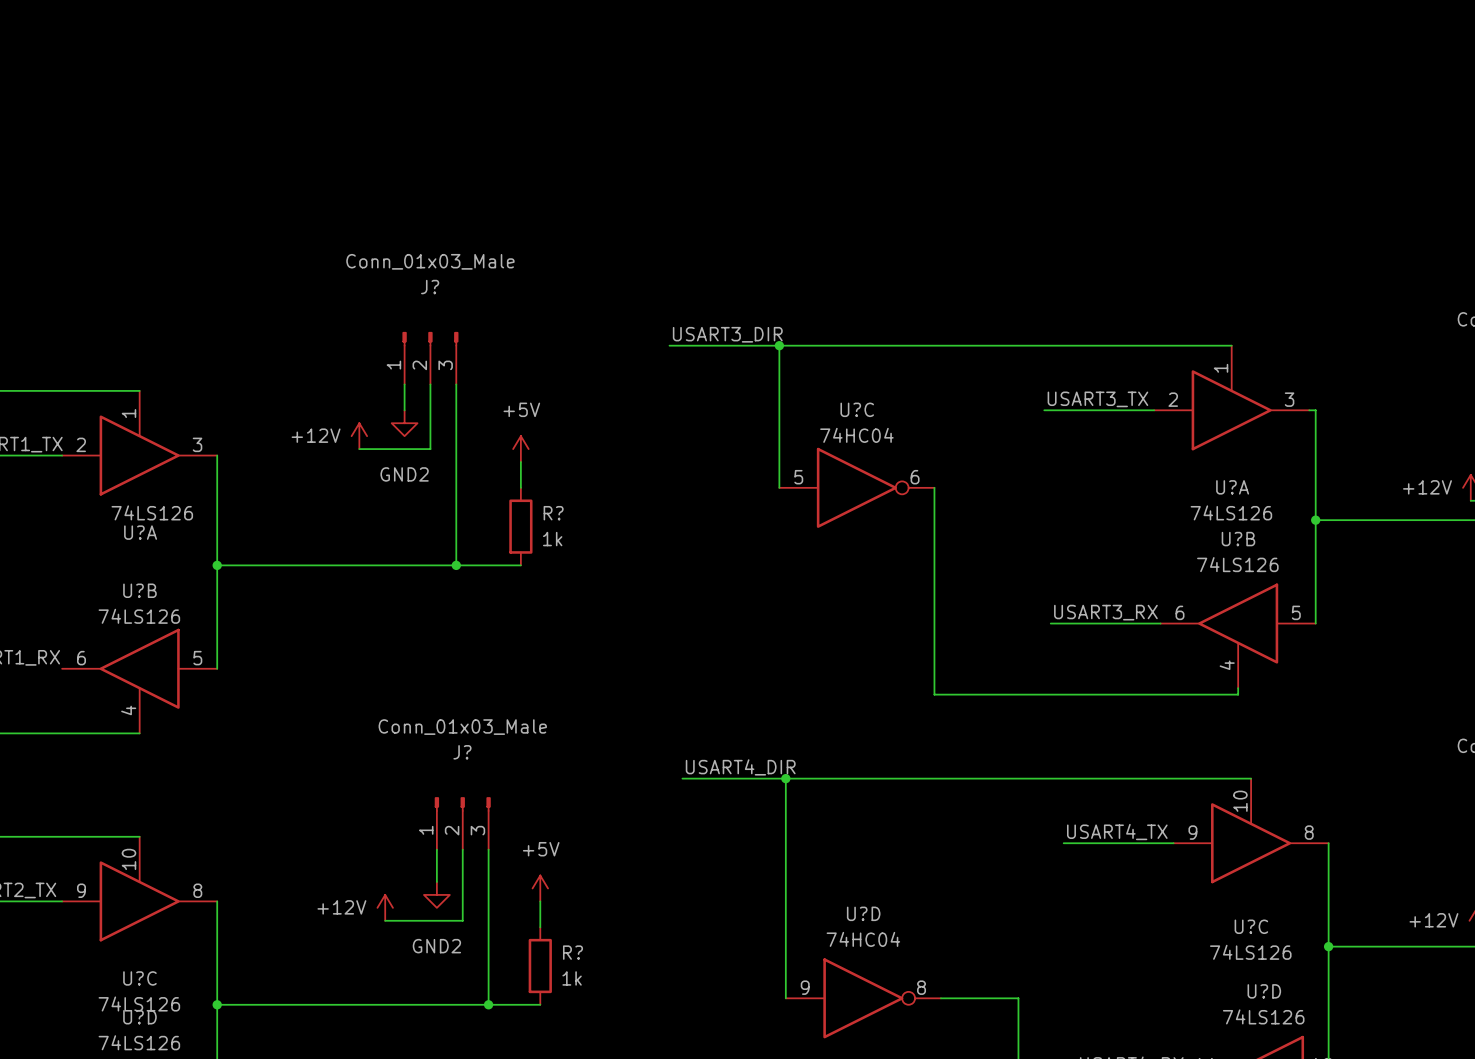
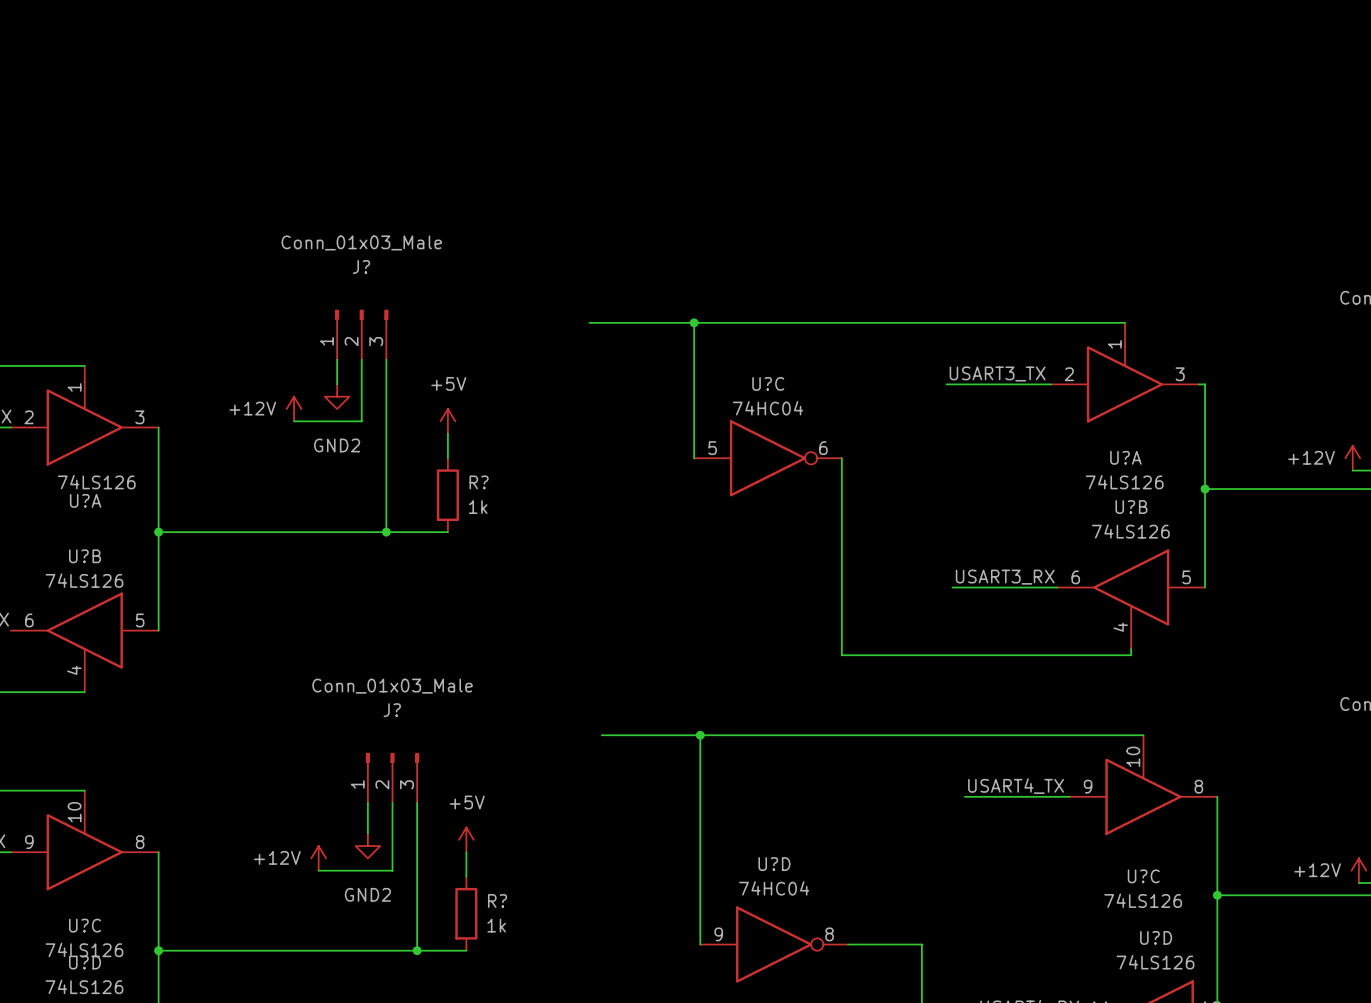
label: USART3_DIR (727, 334) -> none
label: USART4_DIR (740, 767) -> none

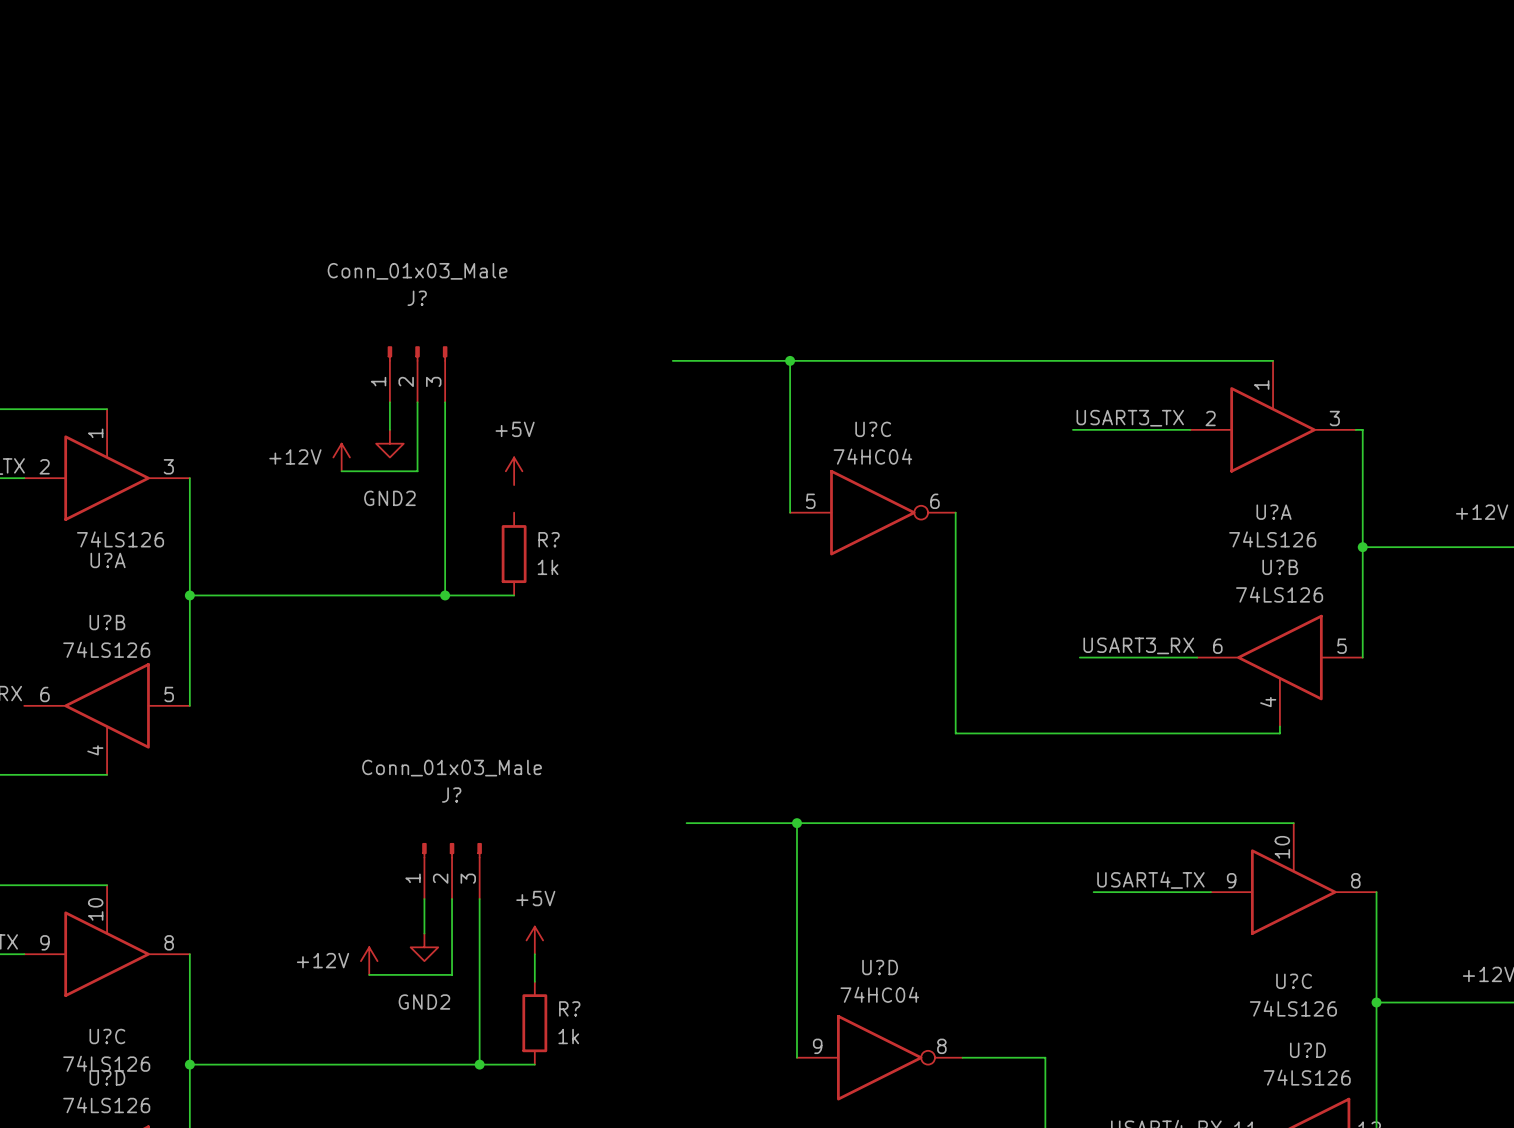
wire: (447, 433) (447, 458) -> none

